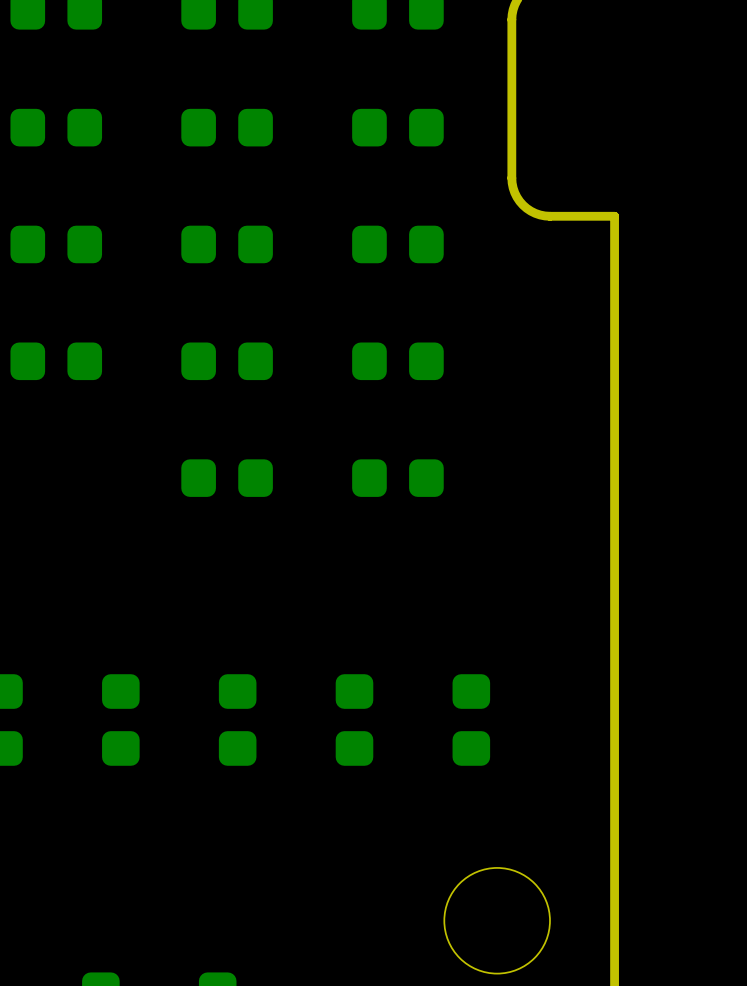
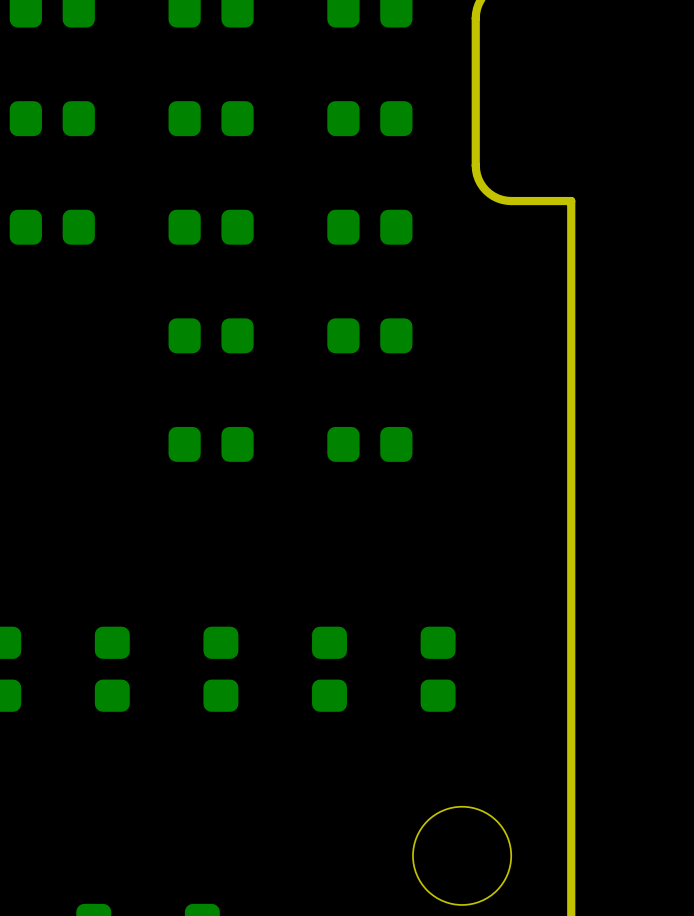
part: (56, 361) -> none

